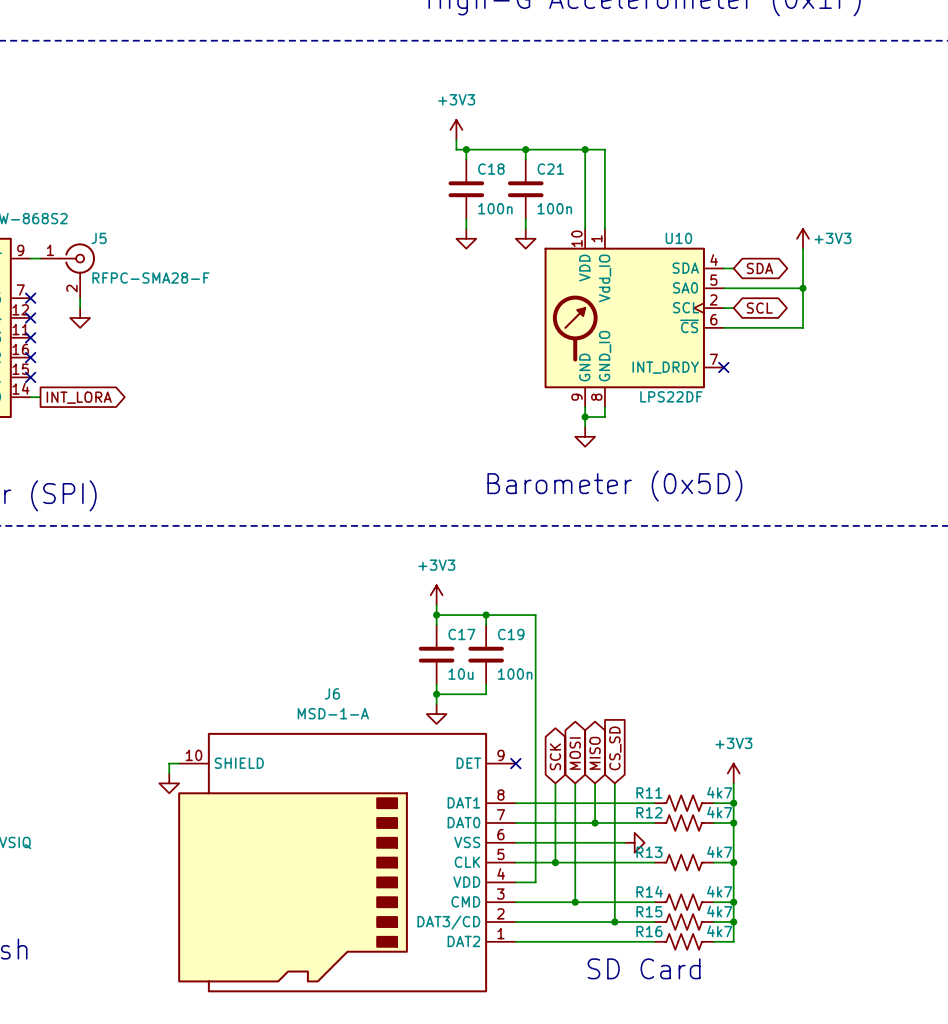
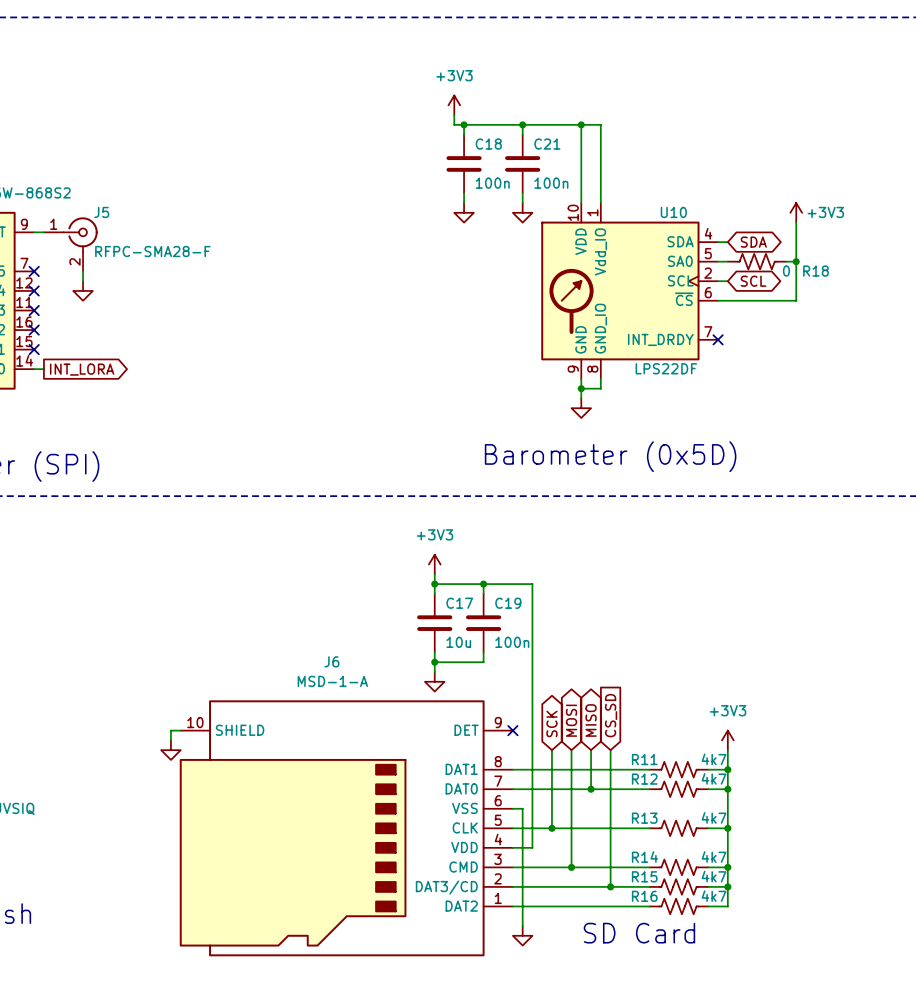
R18: none -> 0 (757, 261)
wire: (525, 842) (624, 842) -> (522, 808) (522, 926)
power symbol rotation: 0° (634, 842) -> 90° clockwise (522, 935)
power symbol position: (634, 842) -> (522, 935)

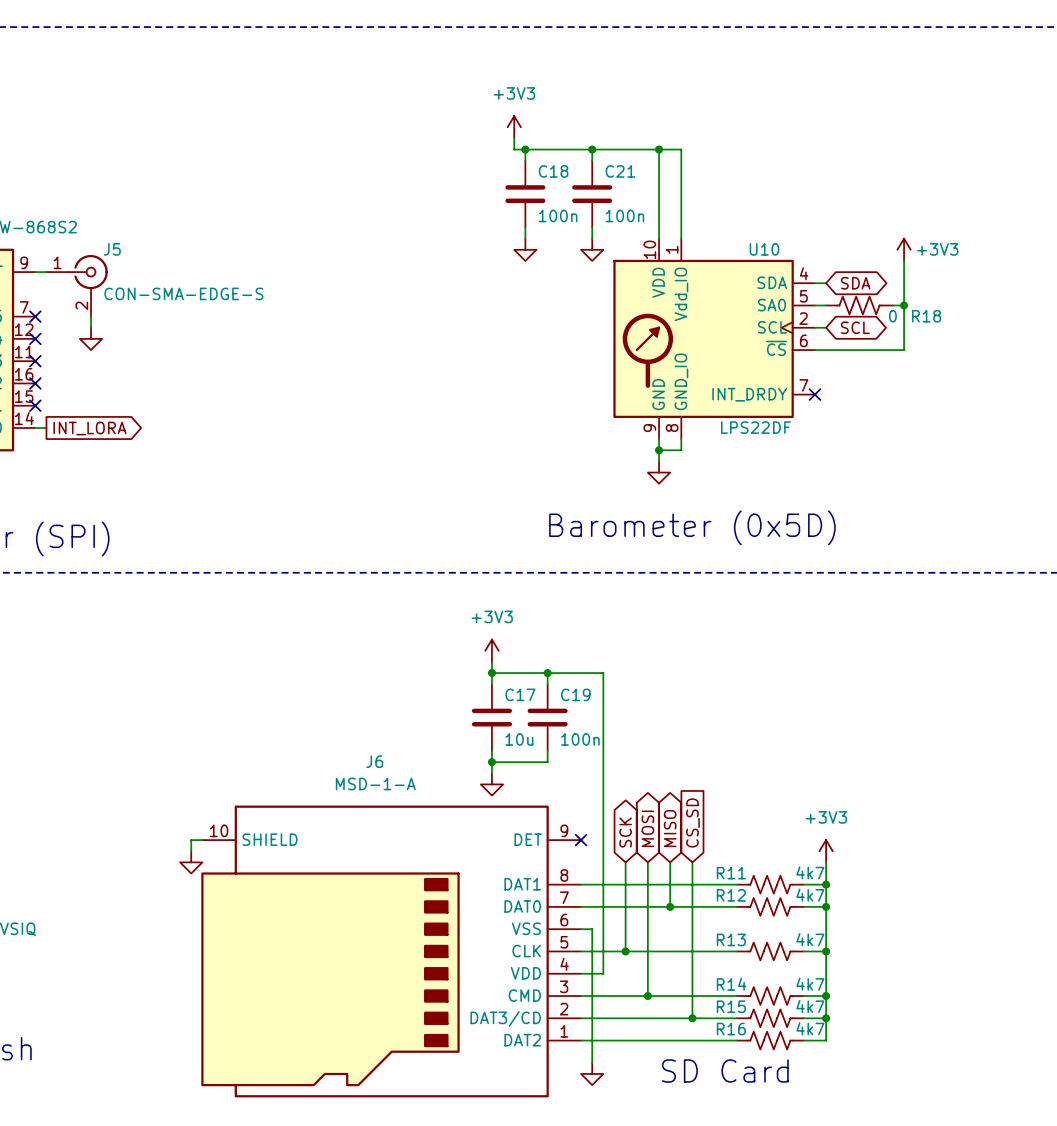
J5 value: RFPC-SMA28-F (152, 251) -> CON-SMA-EDGE-S (183, 293)

